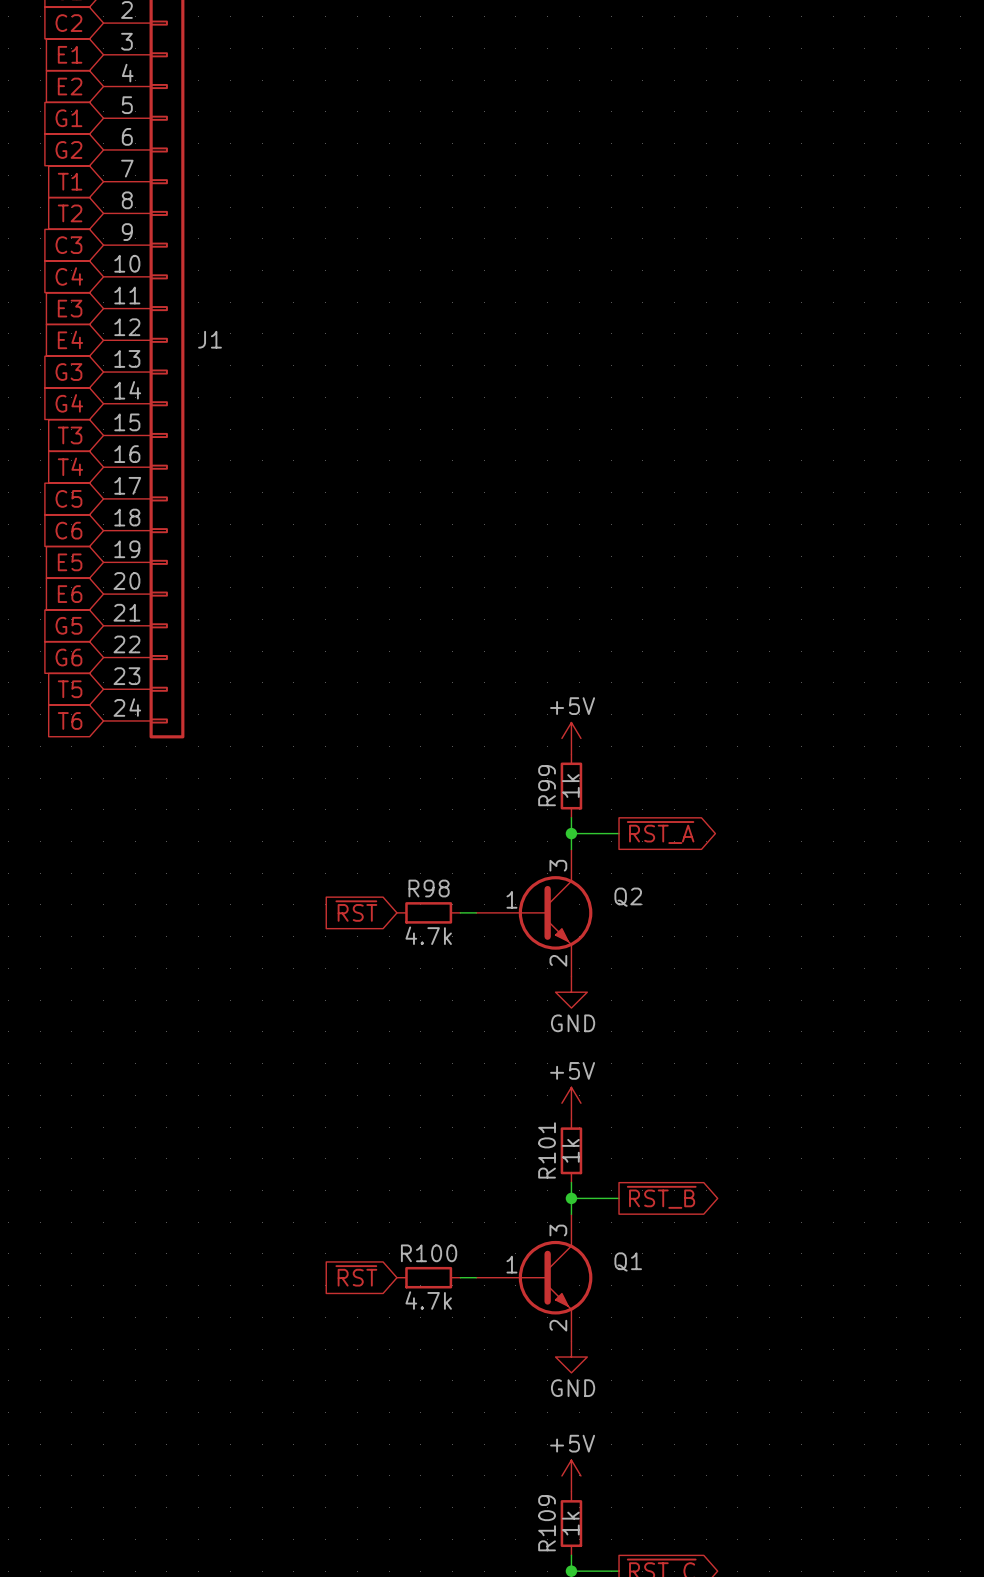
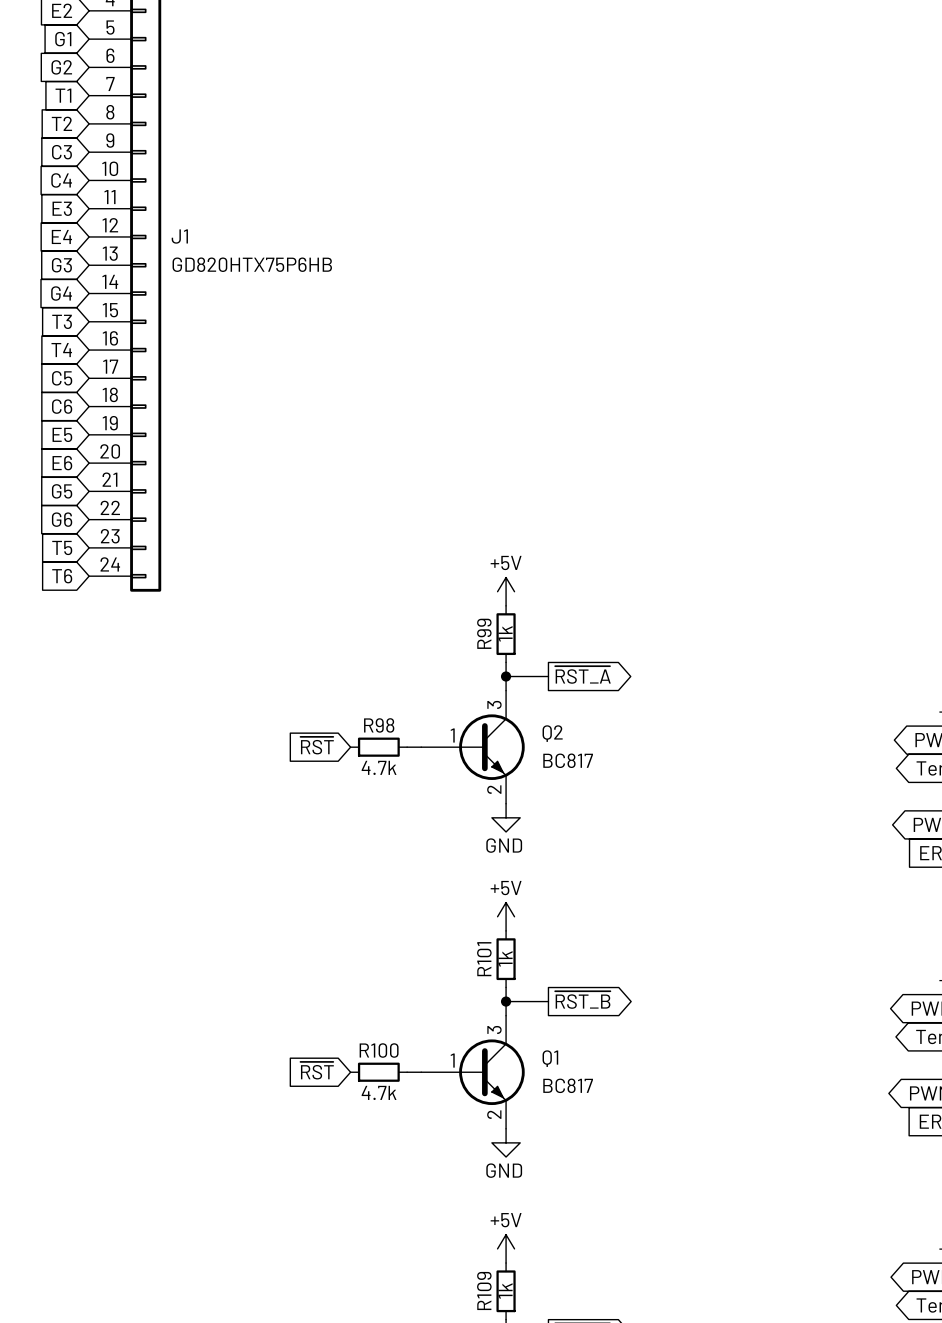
J1 value: none -> GD820HTX75P6HB (252, 264)
Q2 value: none -> BC817 (568, 760)
Q1 value: none -> BC817 (568, 1085)

